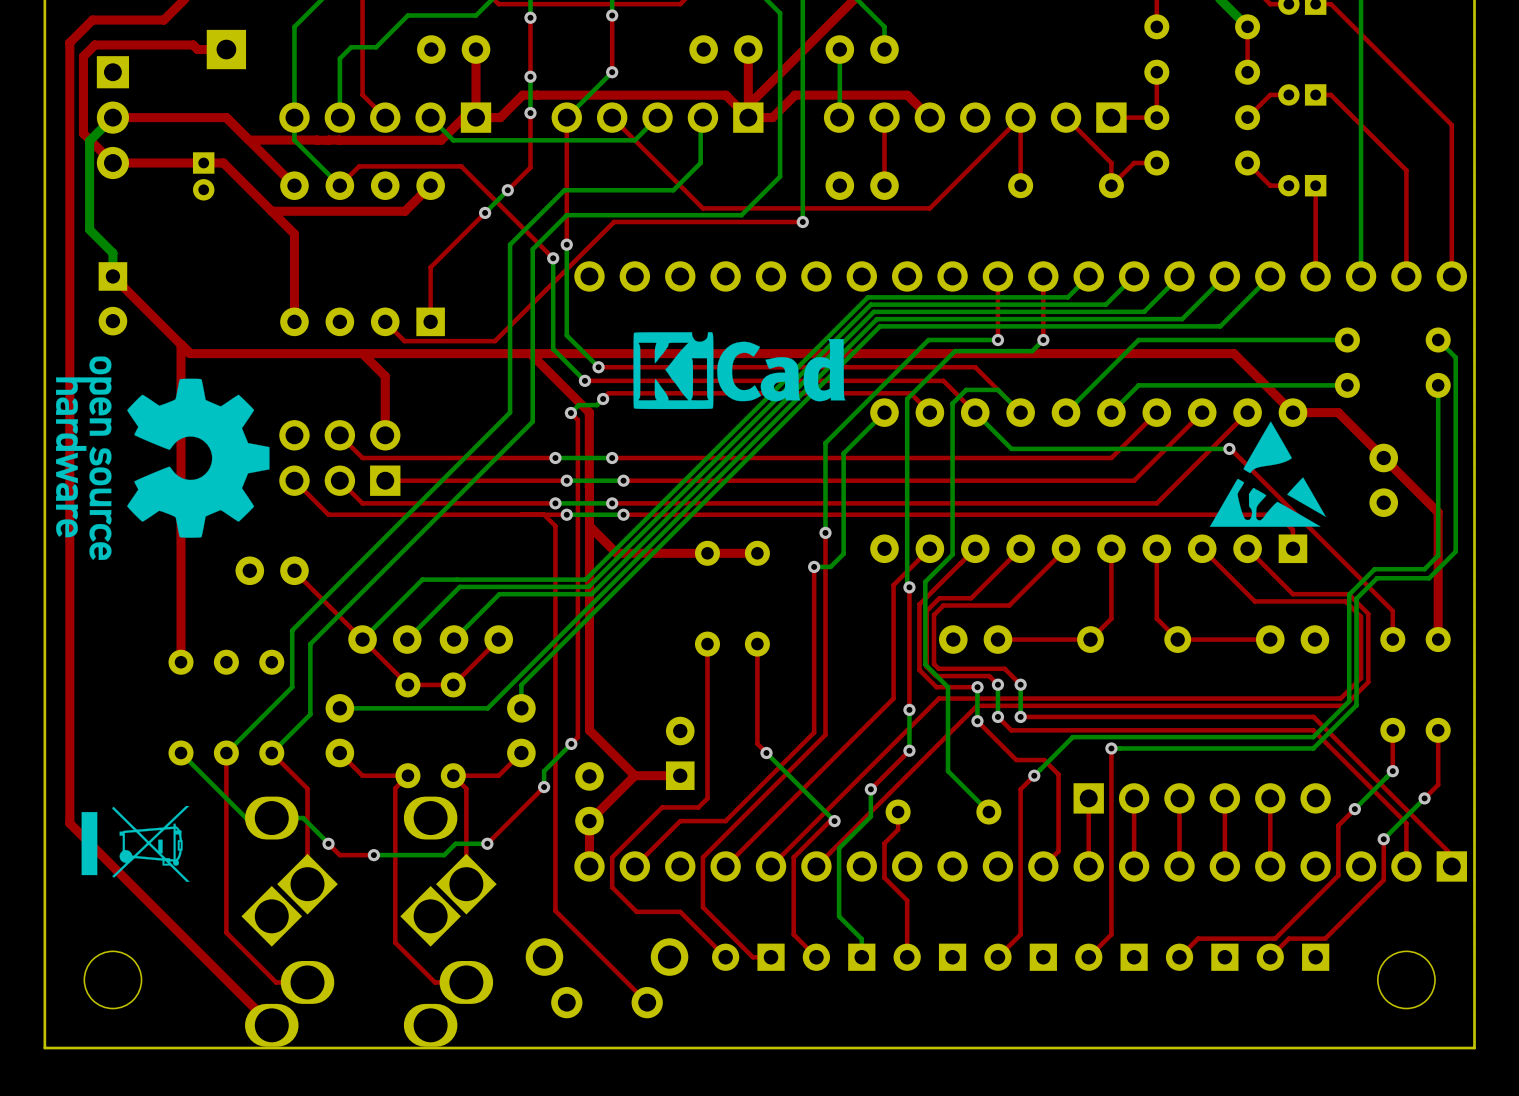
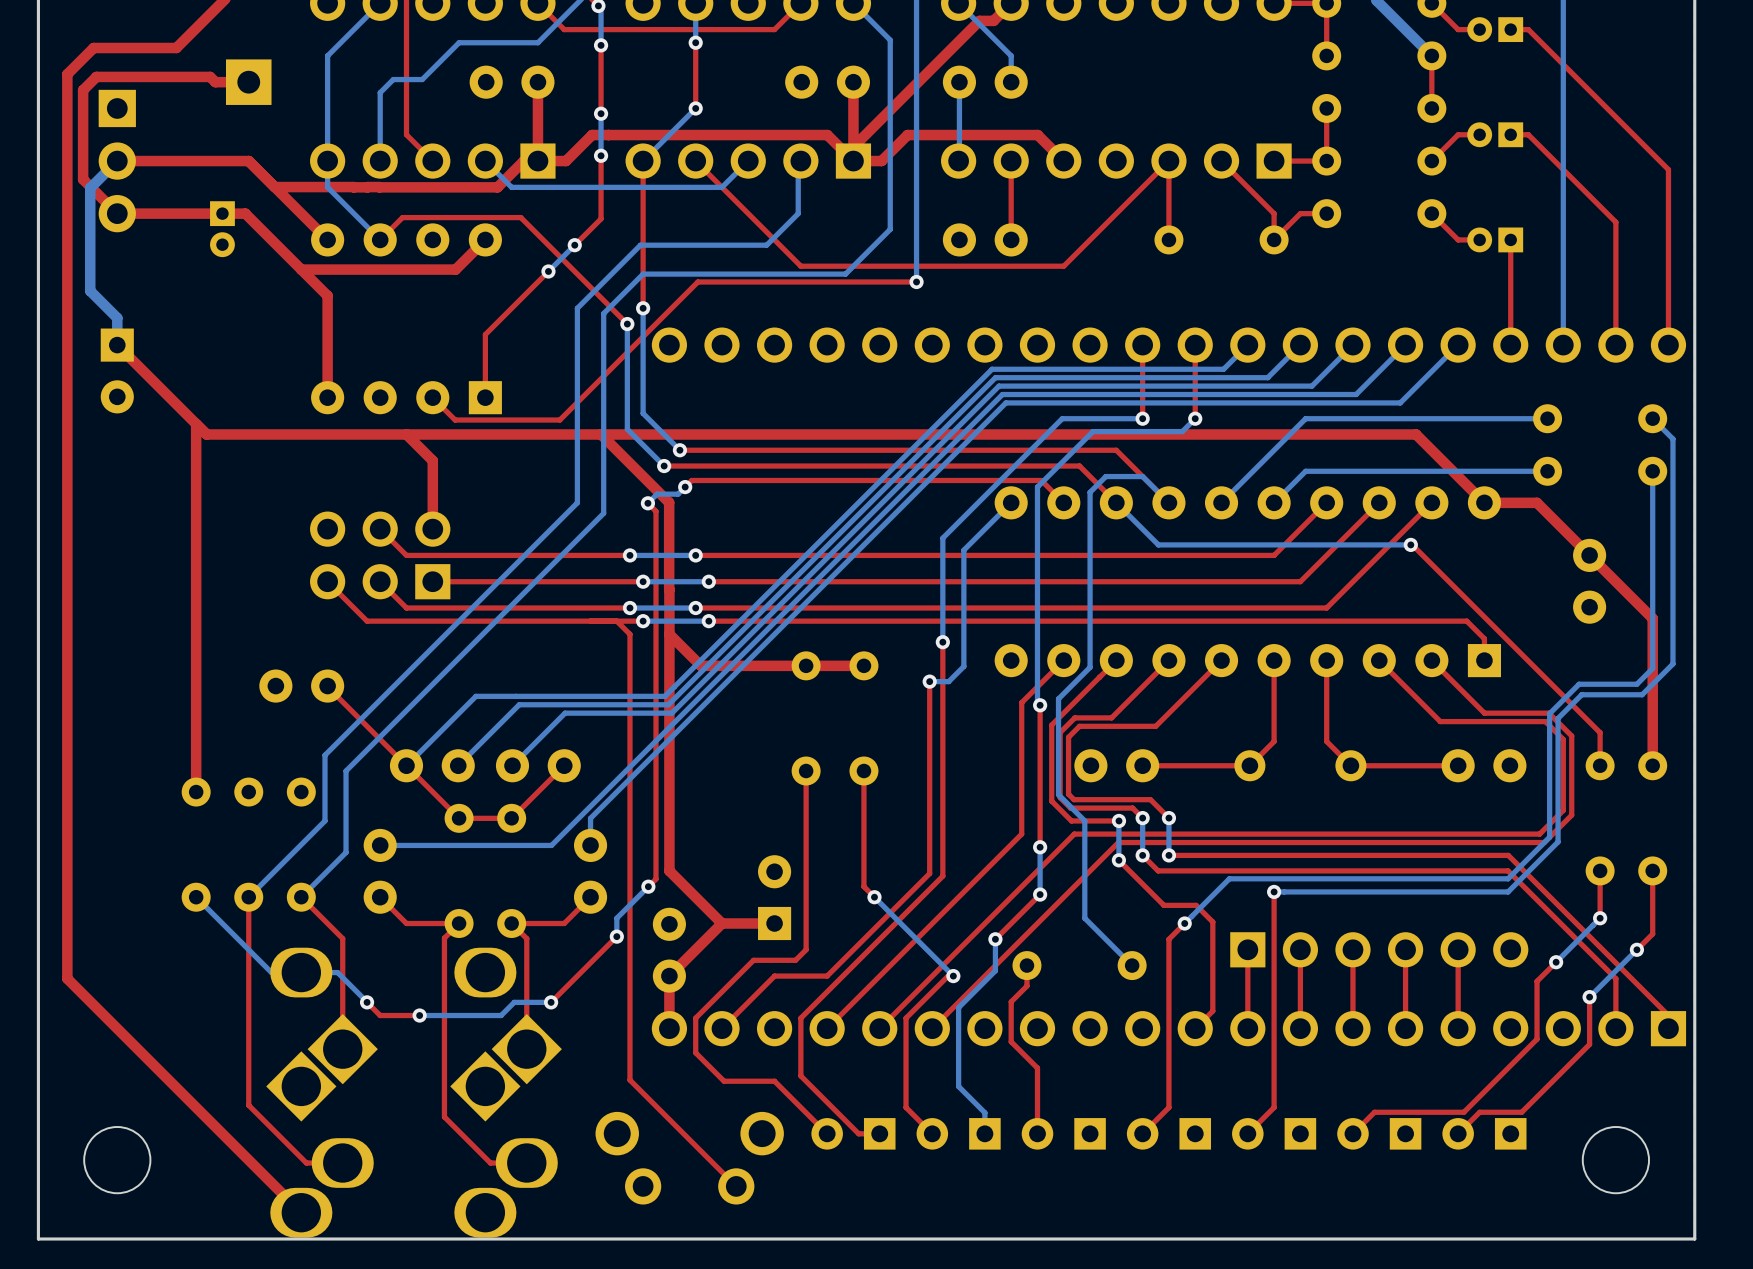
drawing: [633, 332, 846, 410] -> none
drawing: [55, 356, 270, 561] -> none
drawing: [1209, 421, 1326, 527] -> none
drawing: [81, 805, 190, 882] -> none

